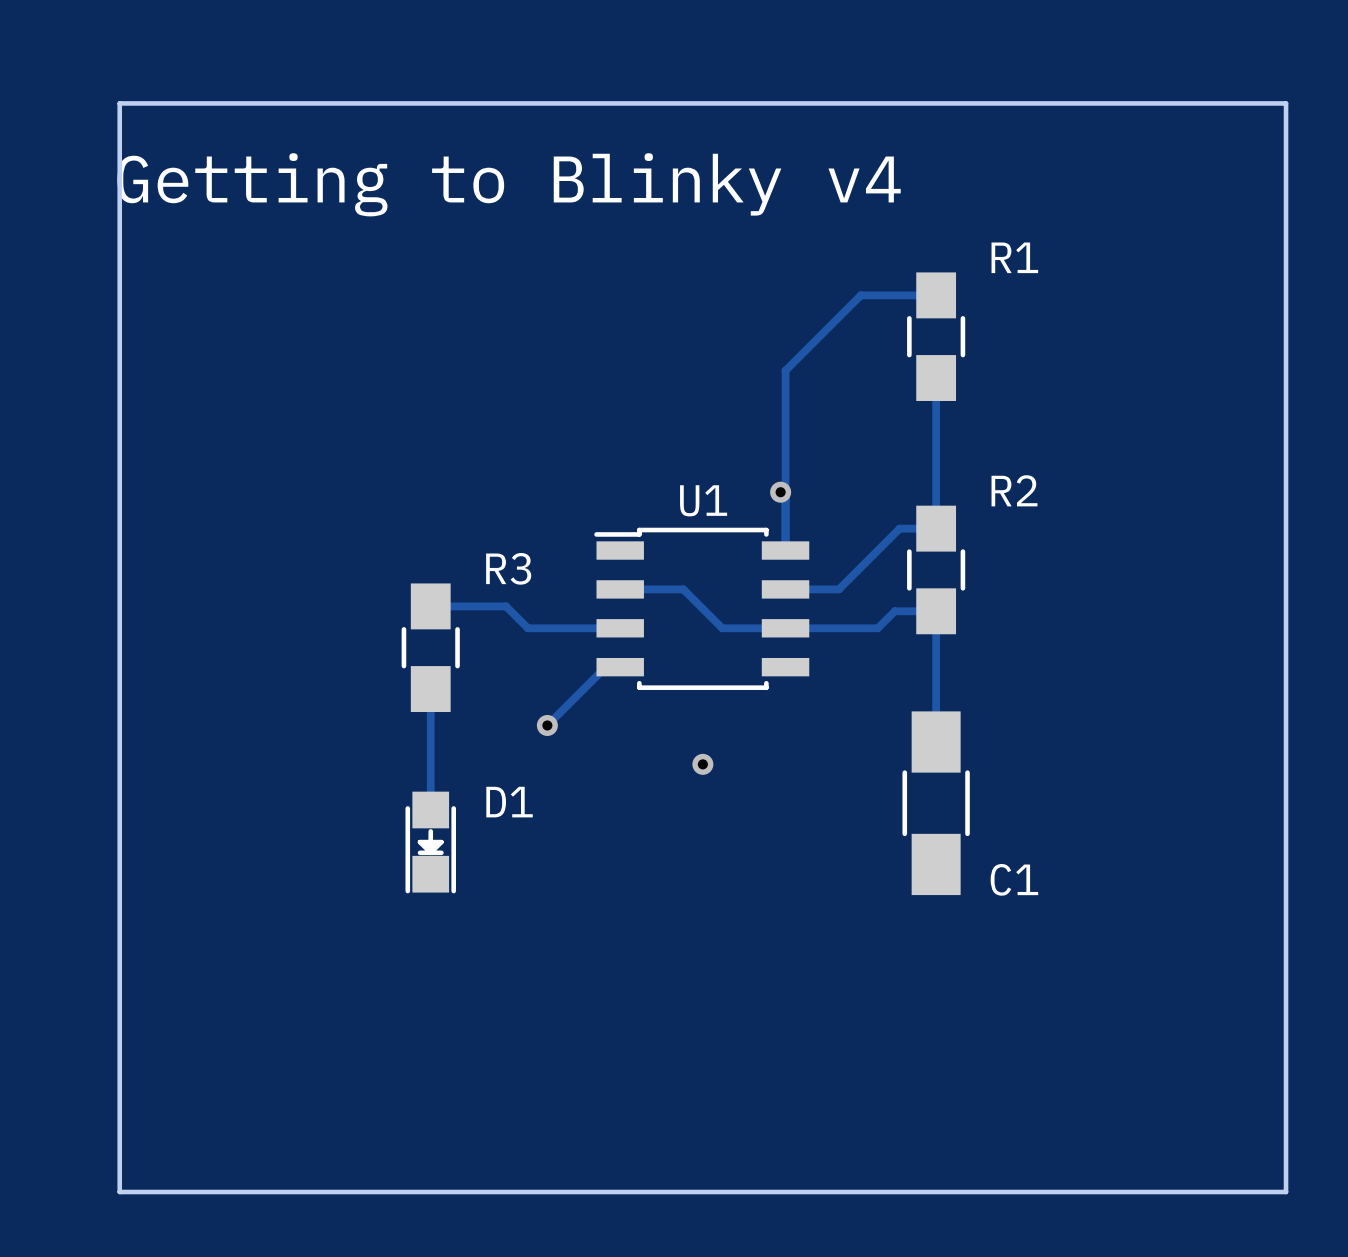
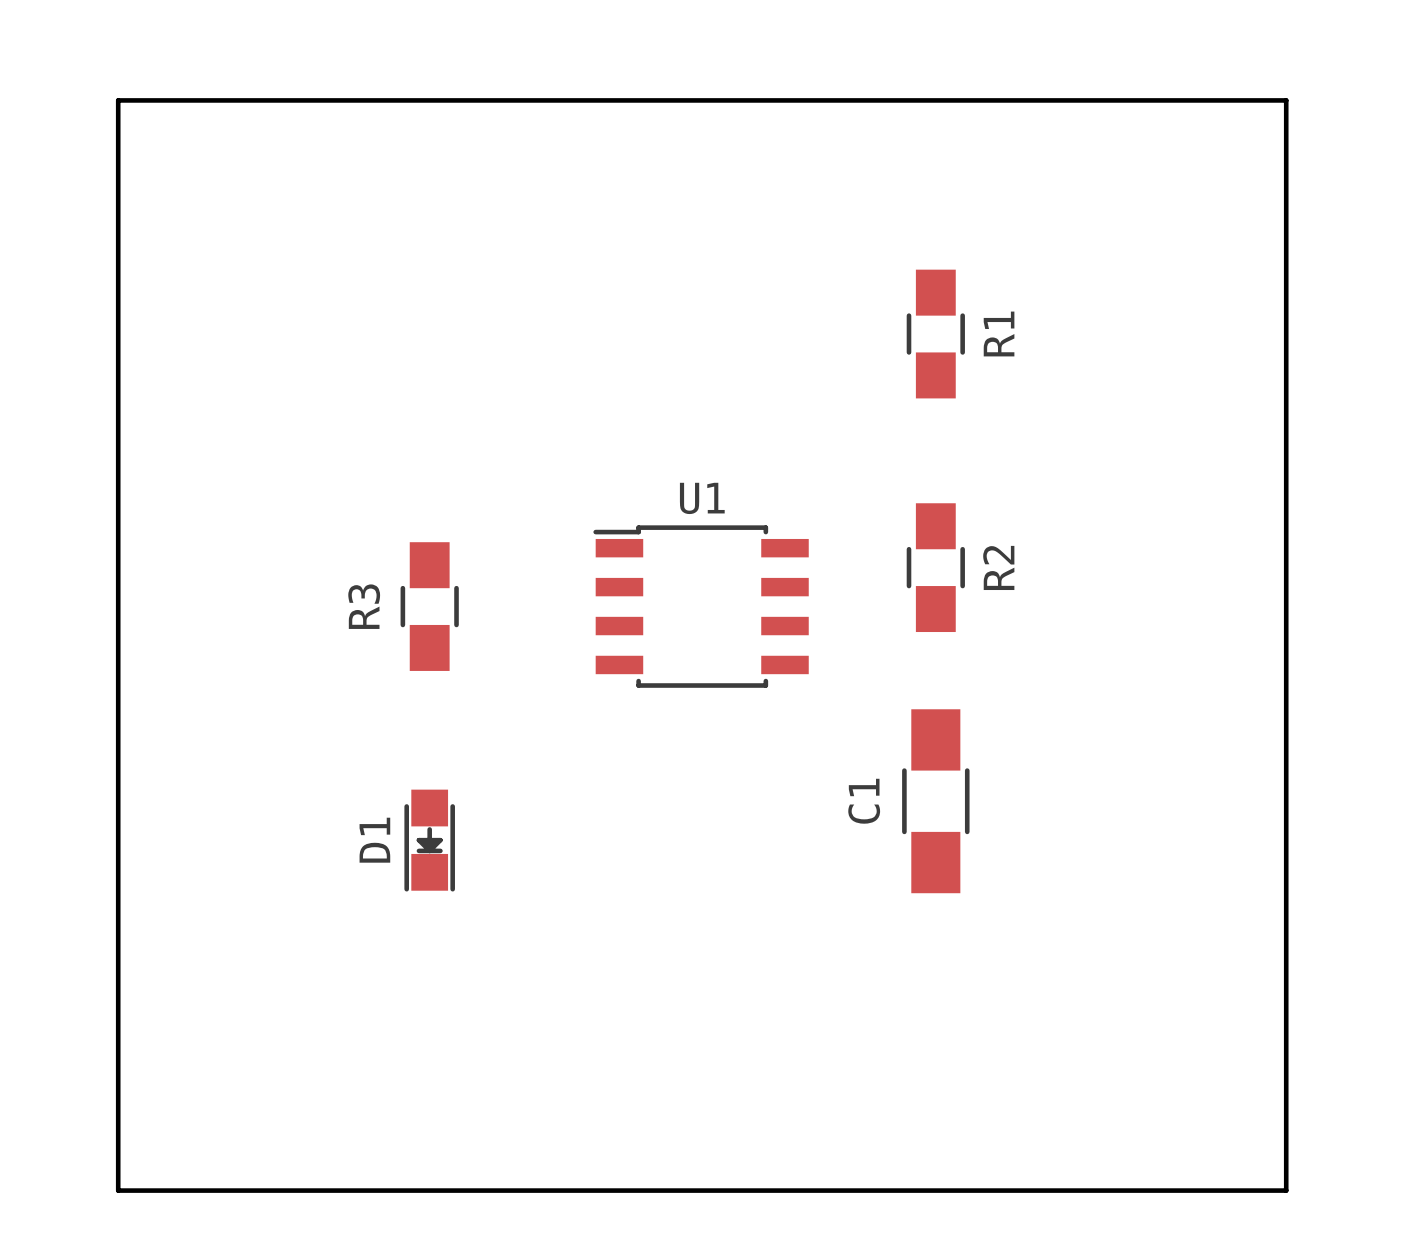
text: Getting to Blinky v4 (509, 184) -> none
R1 name rotation: 0° (1014, 257) -> 90° counterclockwise (999, 333)
R1 name position: R1 (1014, 257) -> R1 (999, 333)
track: (936, 295) (860, 295) (785, 370) (785, 550) -> none
track: (936, 378) (936, 528) (899, 528) (838, 589) (785, 589) -> none
R2 name rotation: 0° (1014, 490) -> 90° counterclockwise (998, 567)
R2 name position: R2 (1014, 490) -> R2 (998, 567)
via: (780, 492) -> none
R3 name rotation: 0° (508, 568) -> 90° counterclockwise (364, 606)
R3 name position: R3 (508, 568) -> R3 (364, 606)
track: (620, 589) (683, 589) (722, 628) (877, 628) (894, 611) (936, 611) (936, 742) -> none
track: (430, 606) (506, 606) (527, 628) (620, 628) -> none
R3 position: (430, 647) -> (429, 606)
track: (620, 667) (605, 667) (547, 725) -> none
track: (430, 689) (430, 809) -> none
via: (547, 725) -> none
via: (702, 764) -> none
D1 name rotation: 0° (509, 802) -> 90° counterclockwise (374, 840)
D1 name position: D1 (509, 802) -> D1 (374, 840)
C1 name rotation: 0° (1014, 879) -> 90° counterclockwise (864, 801)
C1 name position: C1 (1014, 879) -> C1 (864, 801)

